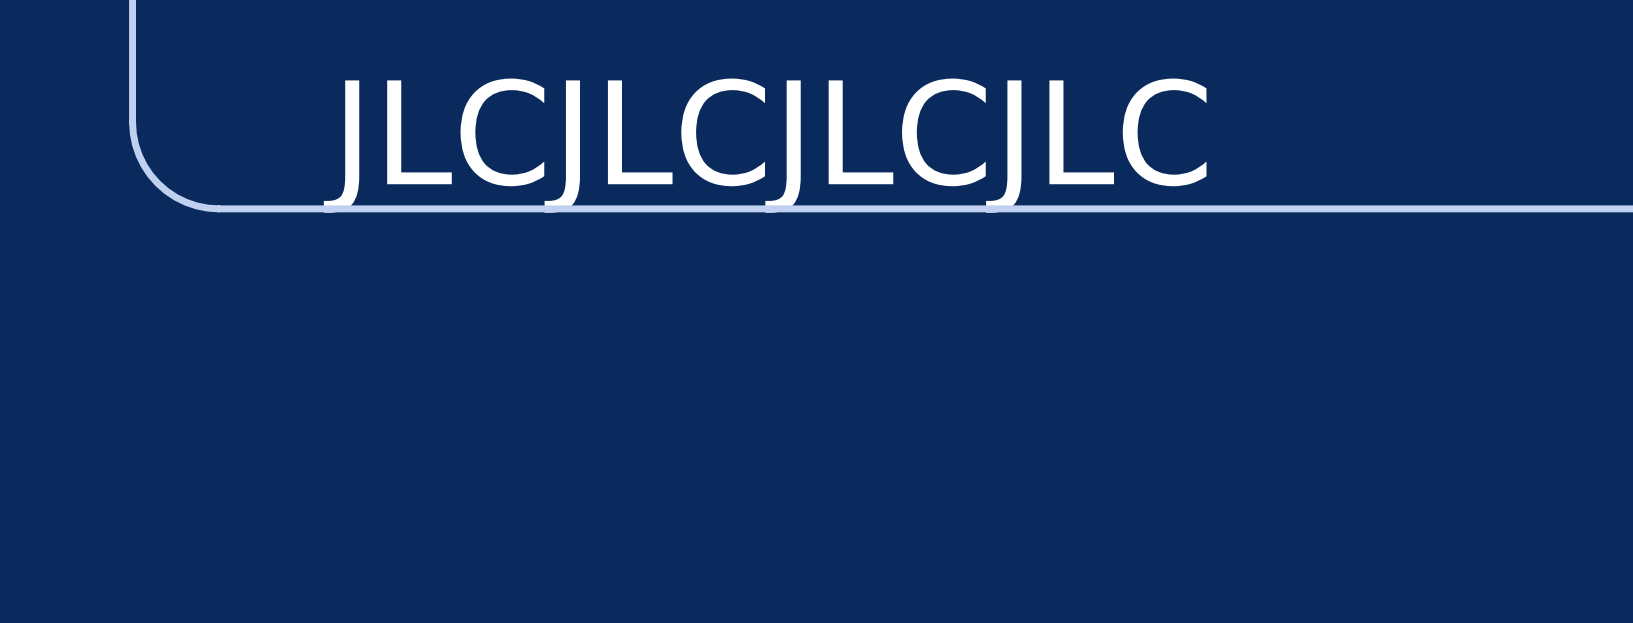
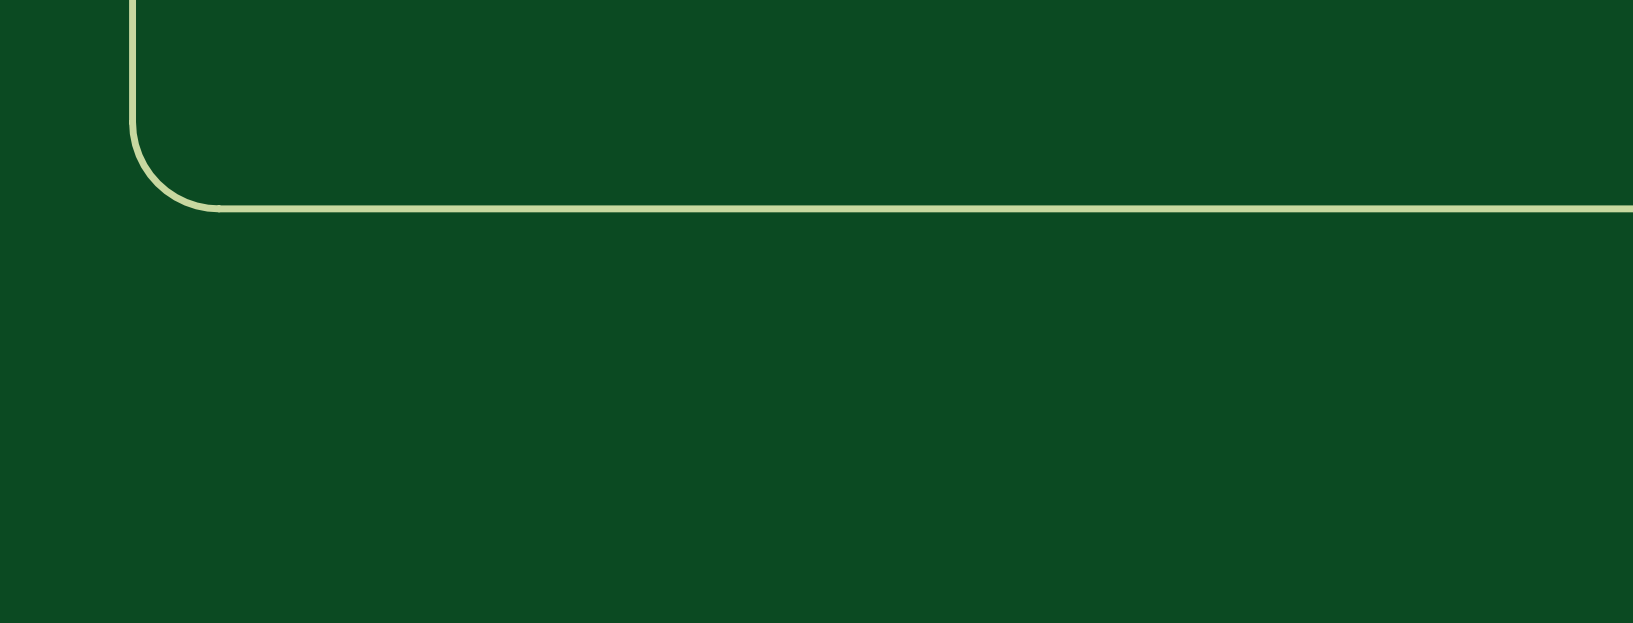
text: JLCJLCJLCJLC (765, 145) -> none

